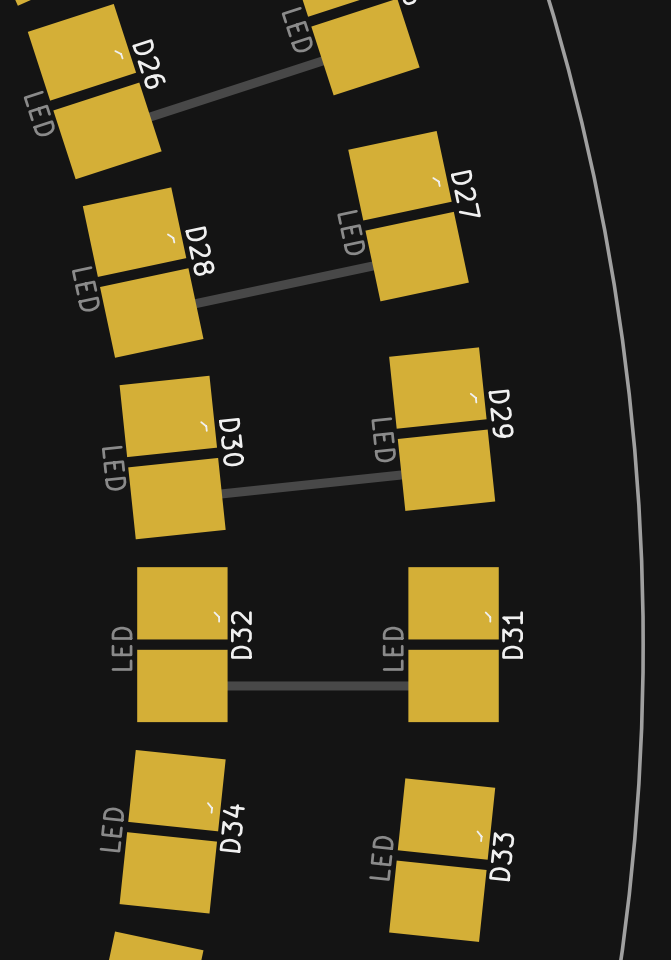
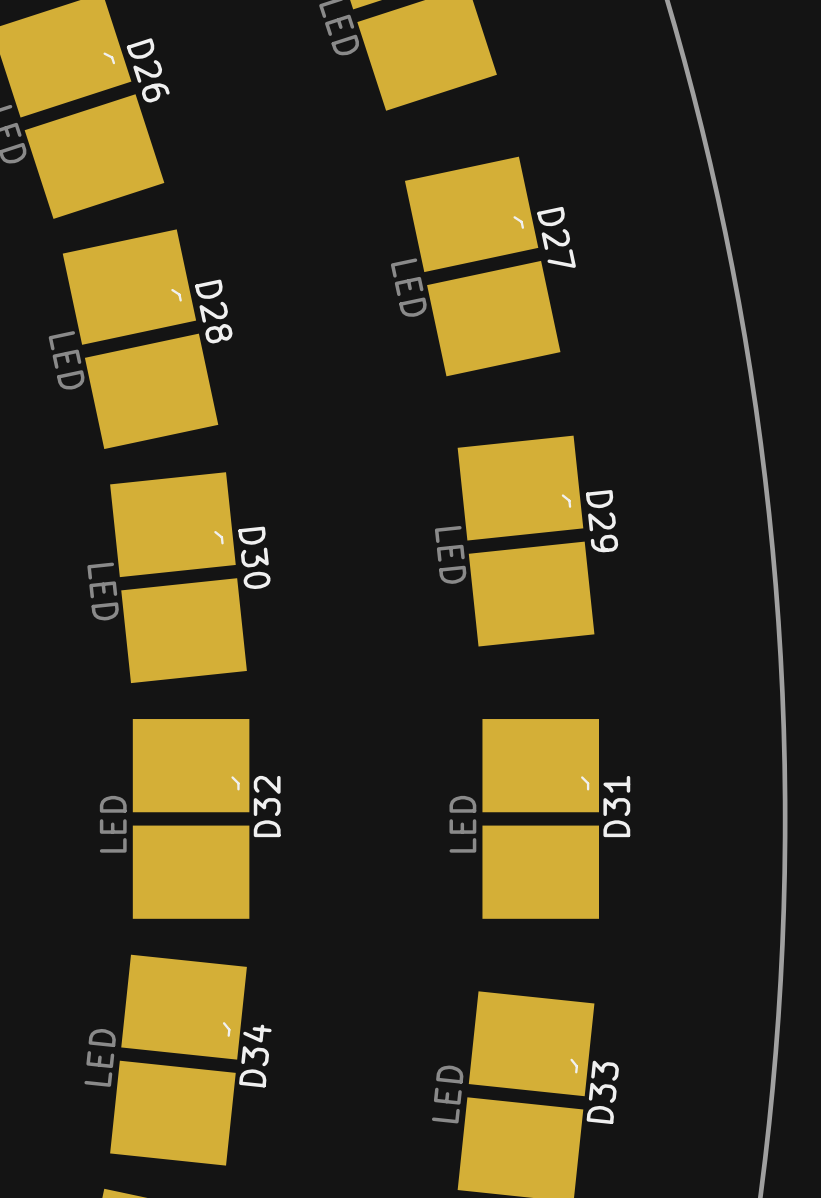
track: (365, 47) (107, 130) -> none
track: (417, 256) (151, 313) -> none
track: (446, 470) (176, 498) -> none
track: (182, 685) (453, 685) -> none

